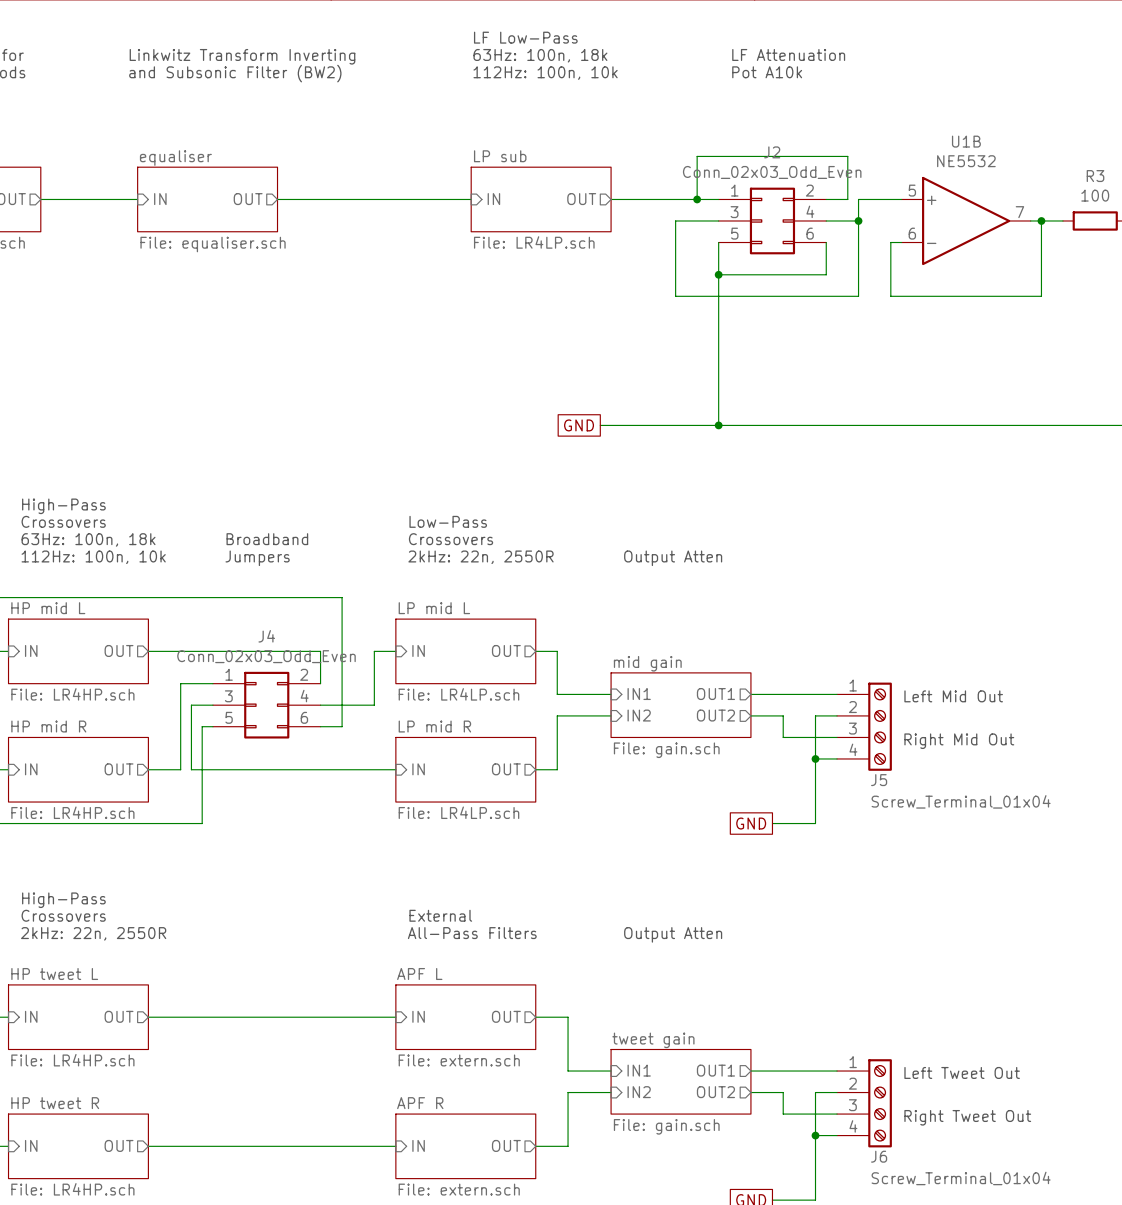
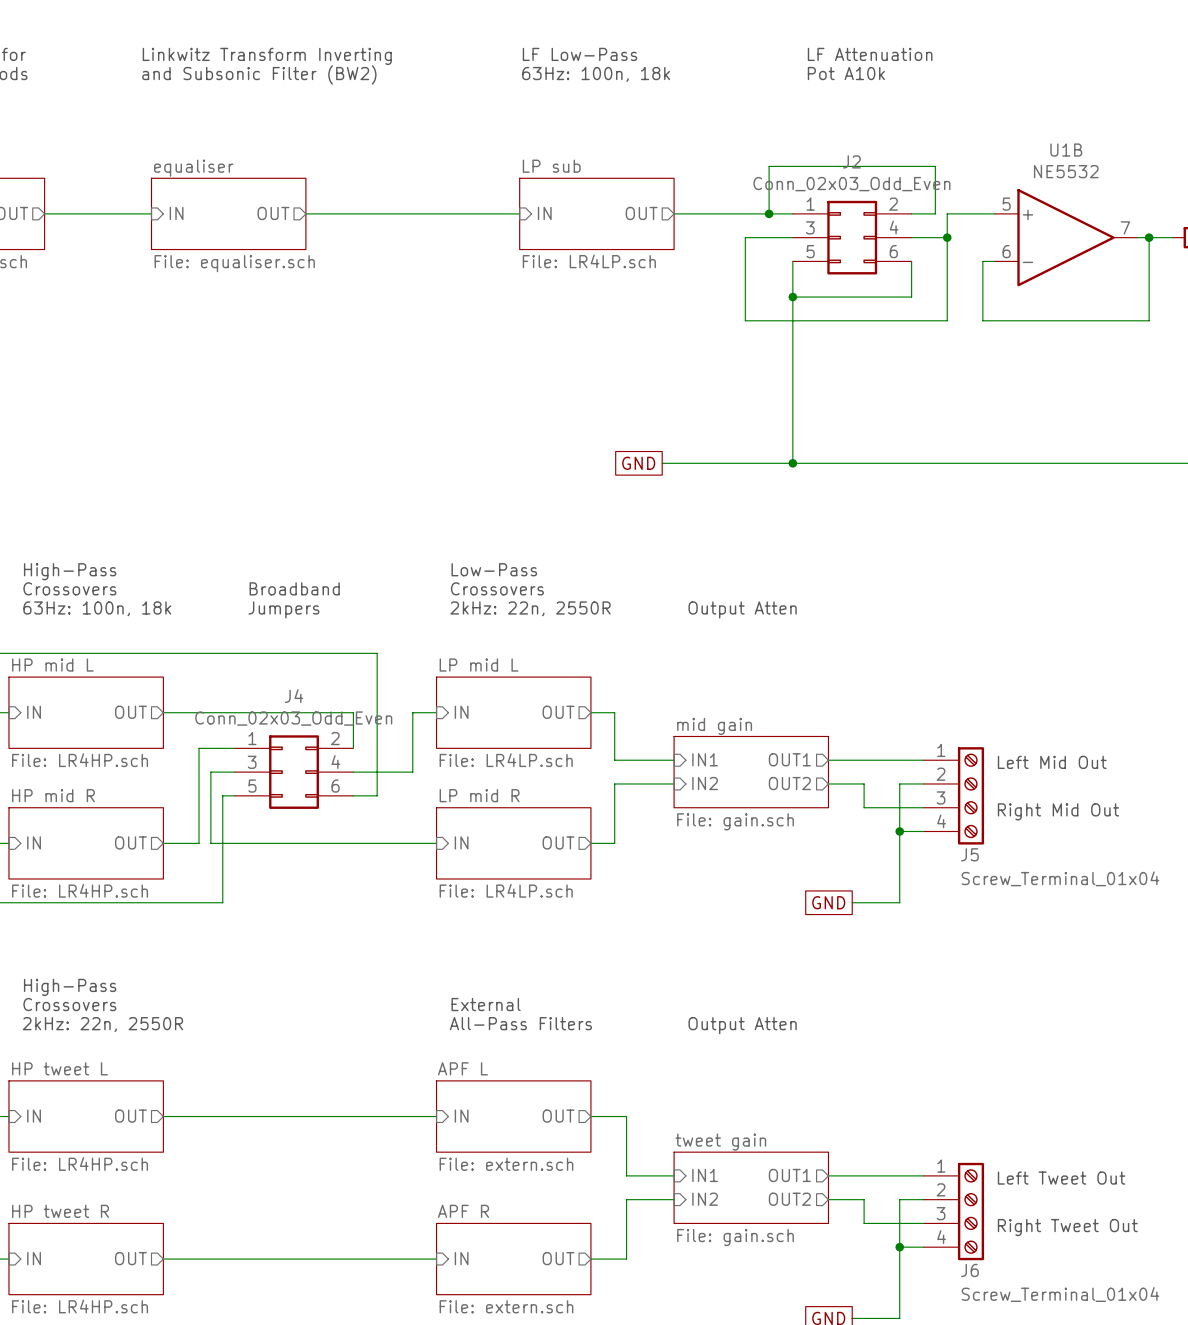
text: LF Low-Pass (525, 37) -> none
text: 63Hz: 100n, 18k (540, 55) -> LF Low-Pass (580, 54)
text: 112Hz: 100n, 10k (545, 73) -> 63Hz: 100n, 18k (596, 74)
text: High-Pass (63, 506) -> none
text: Crossovers (63, 521) -> High-Pass (70, 571)
text: 63Hz: 100n, 18k (88, 539) -> Crossovers (69, 588)
text: 112Hz: 100n, 10k (93, 557) -> 63Hz: 100n, 18k (97, 608)

